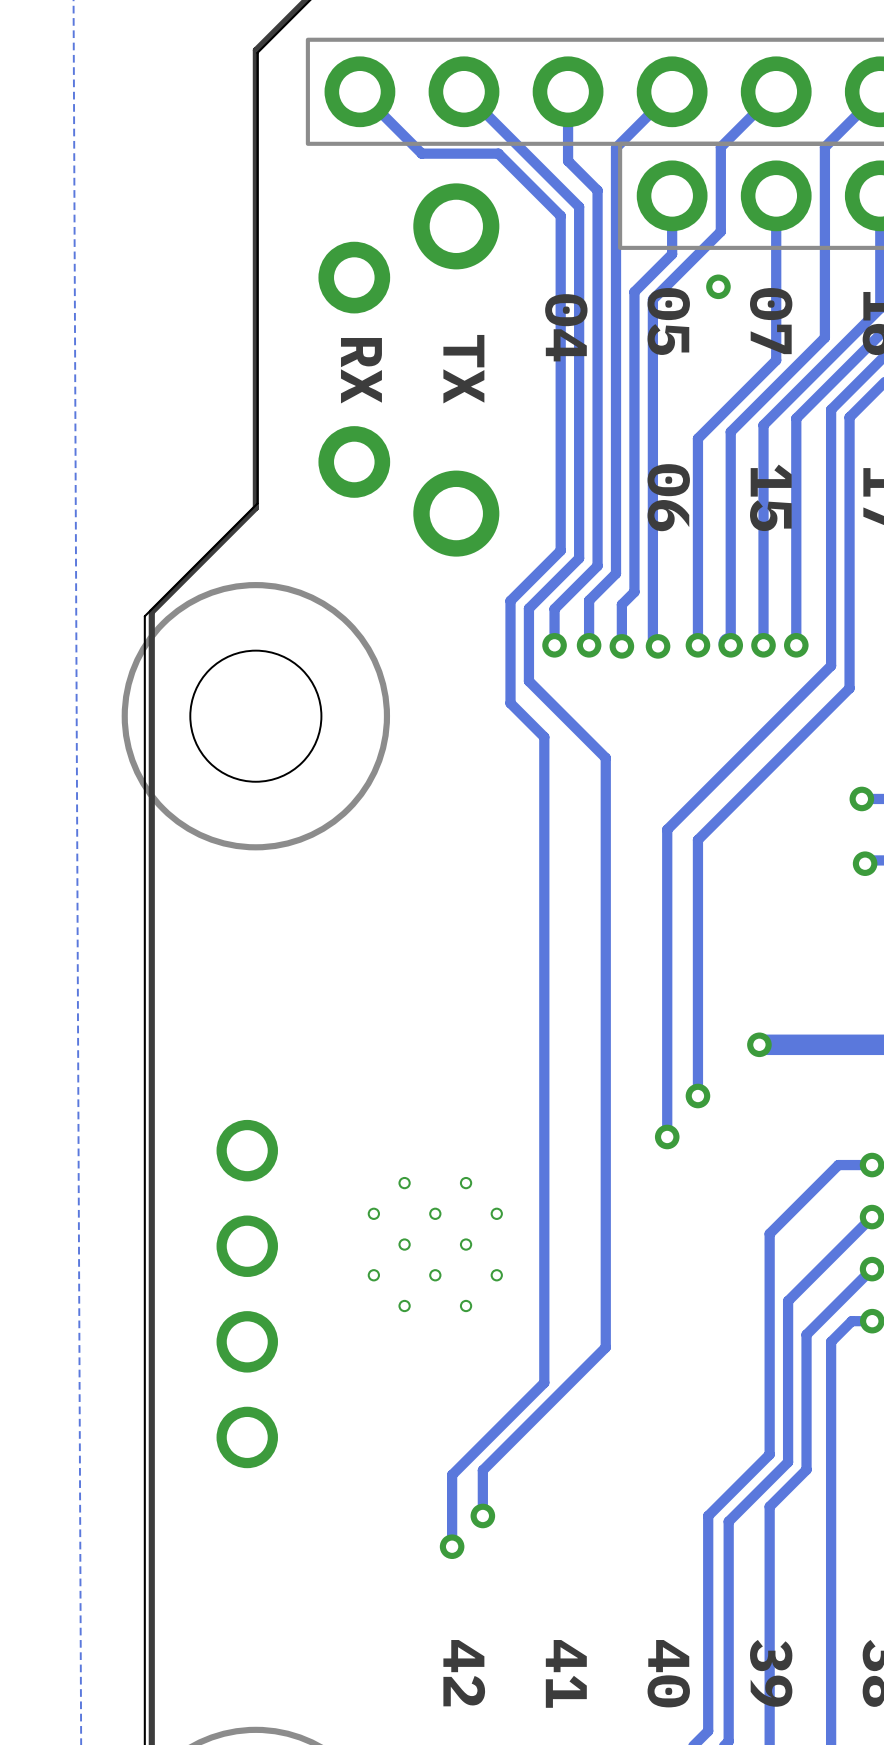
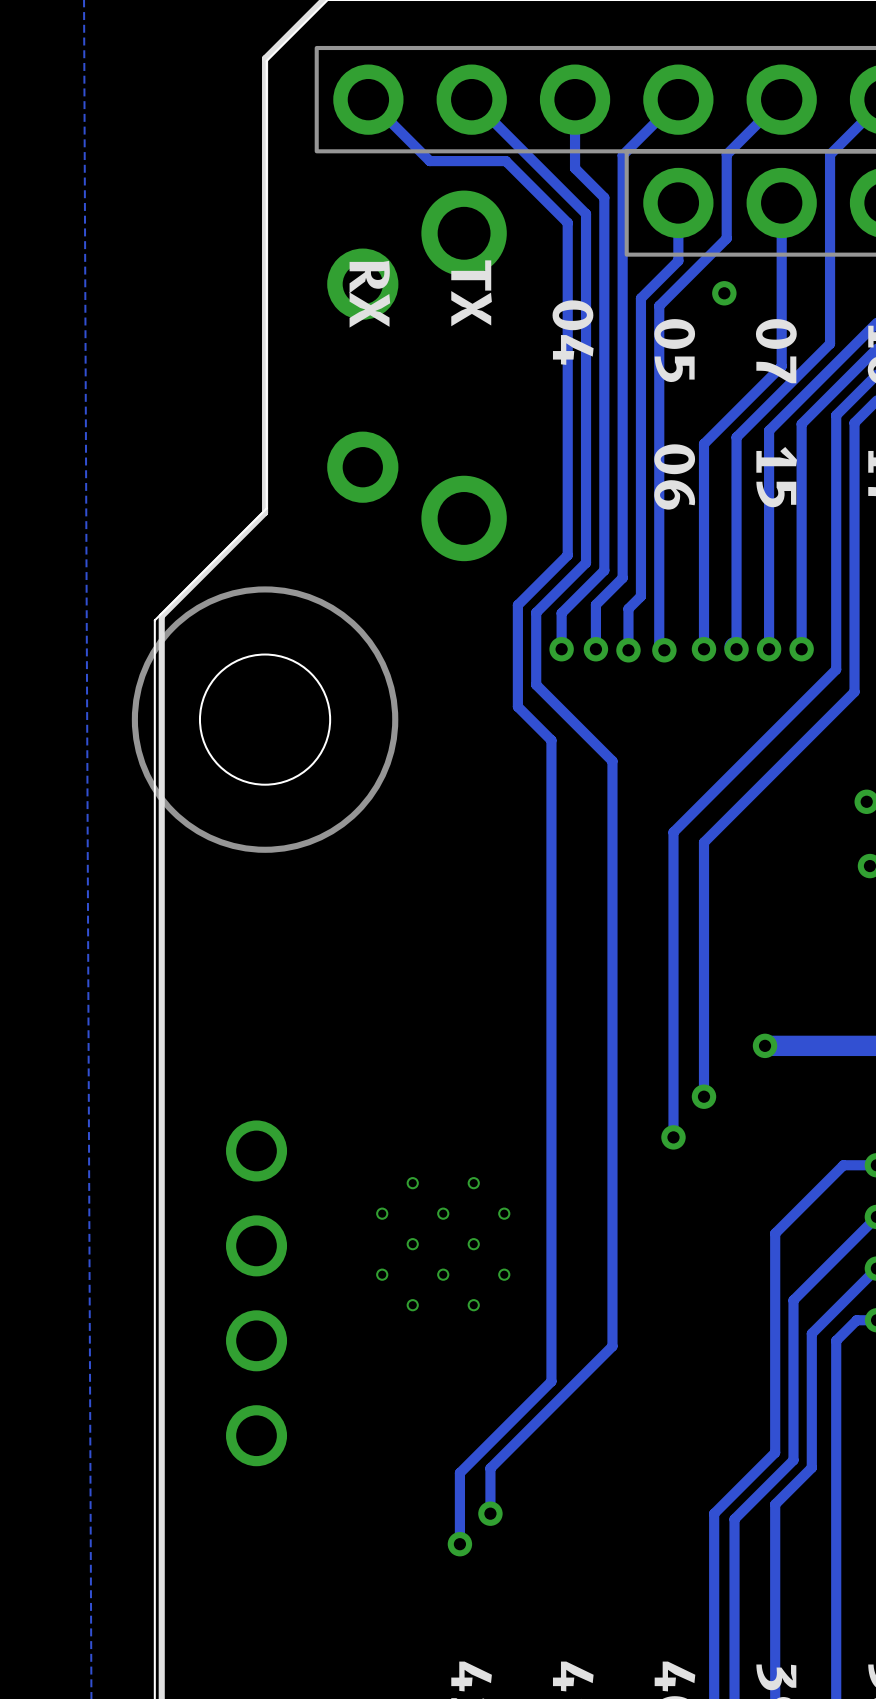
text position: TX (463, 369) -> TX (471, 293)
text position: RX (361, 370) -> RX (369, 294)

